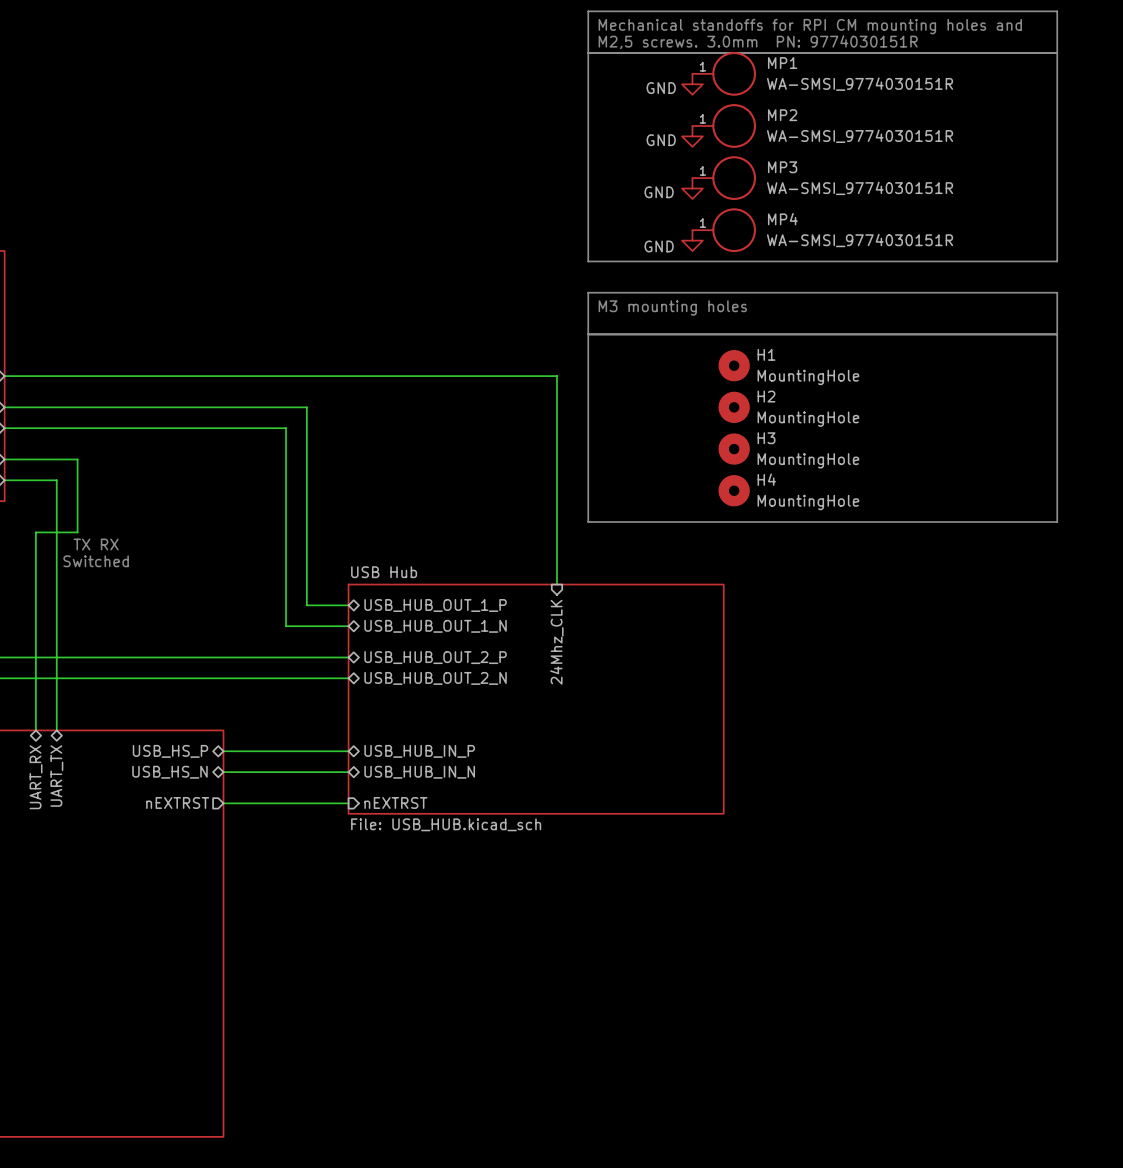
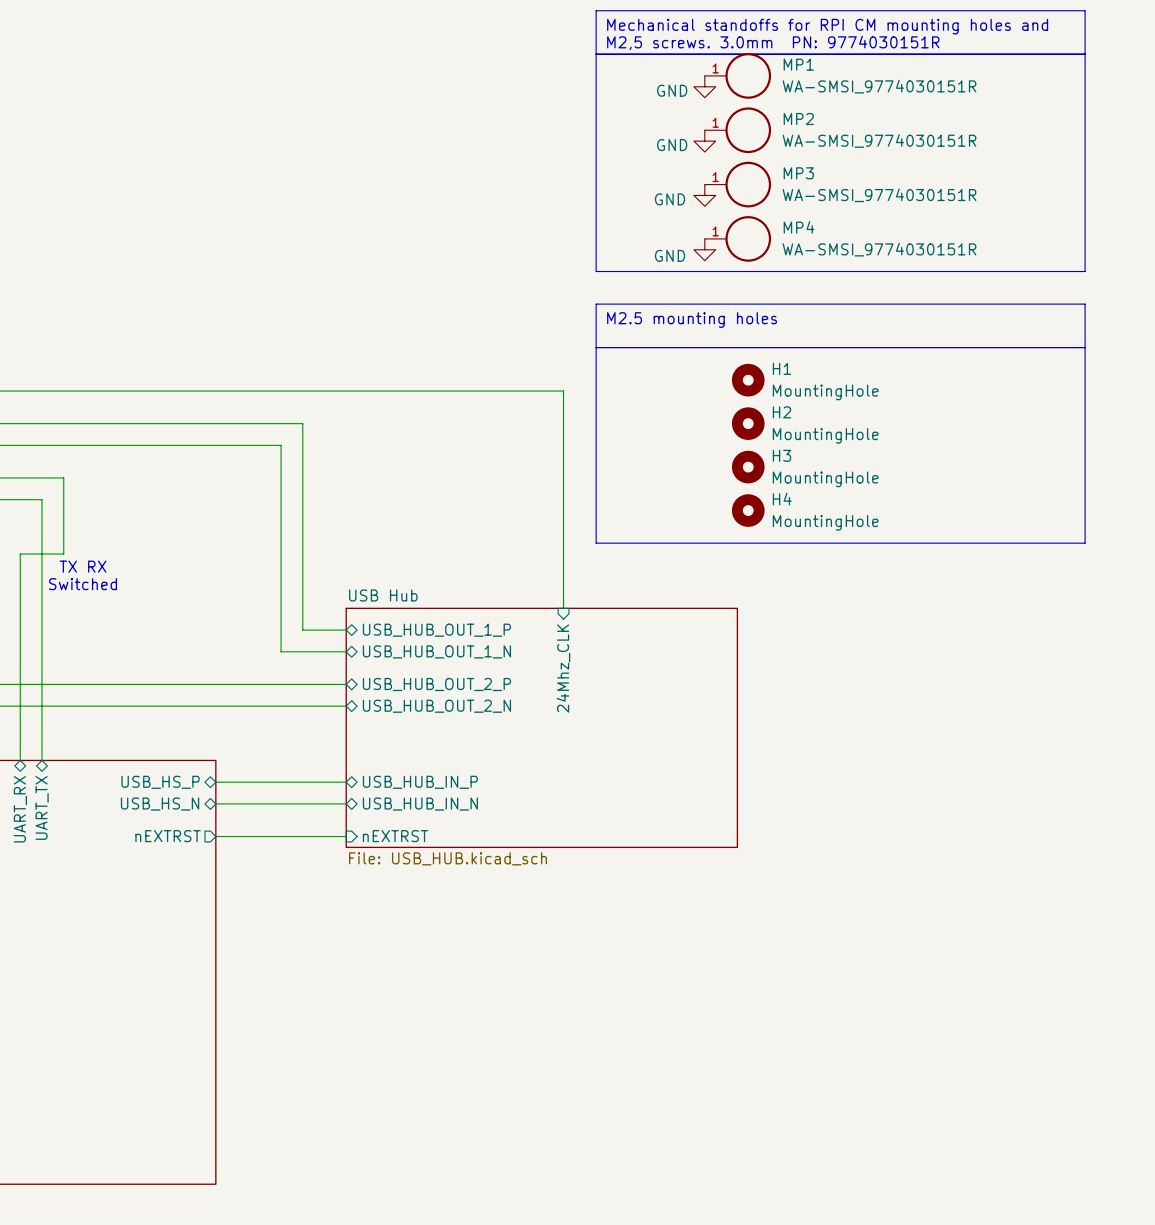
text: M3 mounting holes (672, 307) -> M2.5 mounting holes (692, 320)

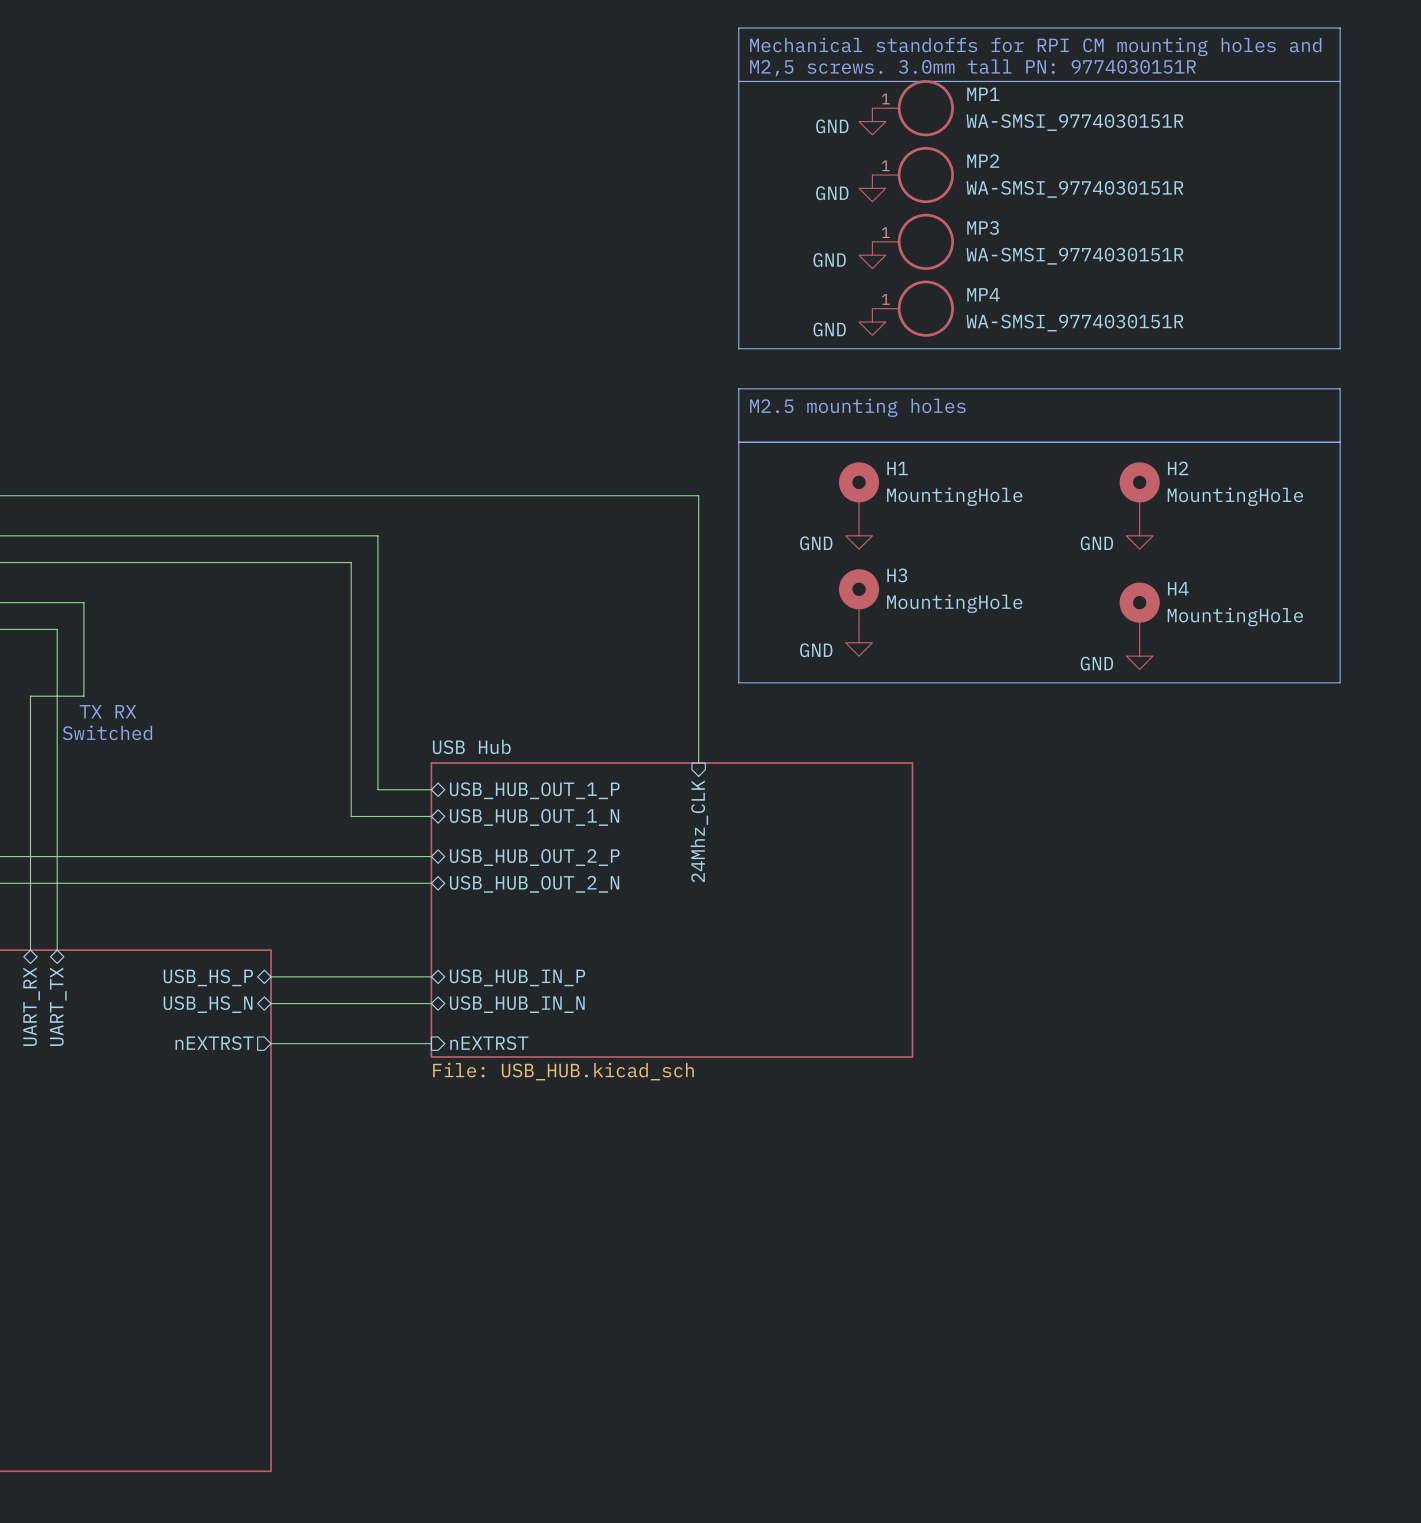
text: M2,5 screws. 3.0mm PN: 9774030151R (773, 42) -> M2,5 screws. 3.0mm tall PN: 9774030151R (972, 67)
H1 symbol: [731, 363, 765, 397] -> [838, 462, 880, 523]
H2 symbol: [731, 407, 765, 440] -> [1119, 462, 1160, 523]
power symbol: none -> GND (859, 535)
power symbol: none -> GND (1139, 535)
H3 symbol: [731, 450, 765, 484] -> [838, 569, 880, 630]
H4 symbol: [731, 494, 765, 527] -> [1119, 582, 1160, 643]
power symbol: none -> GND (859, 642)
power symbol: none -> GND (1139, 656)

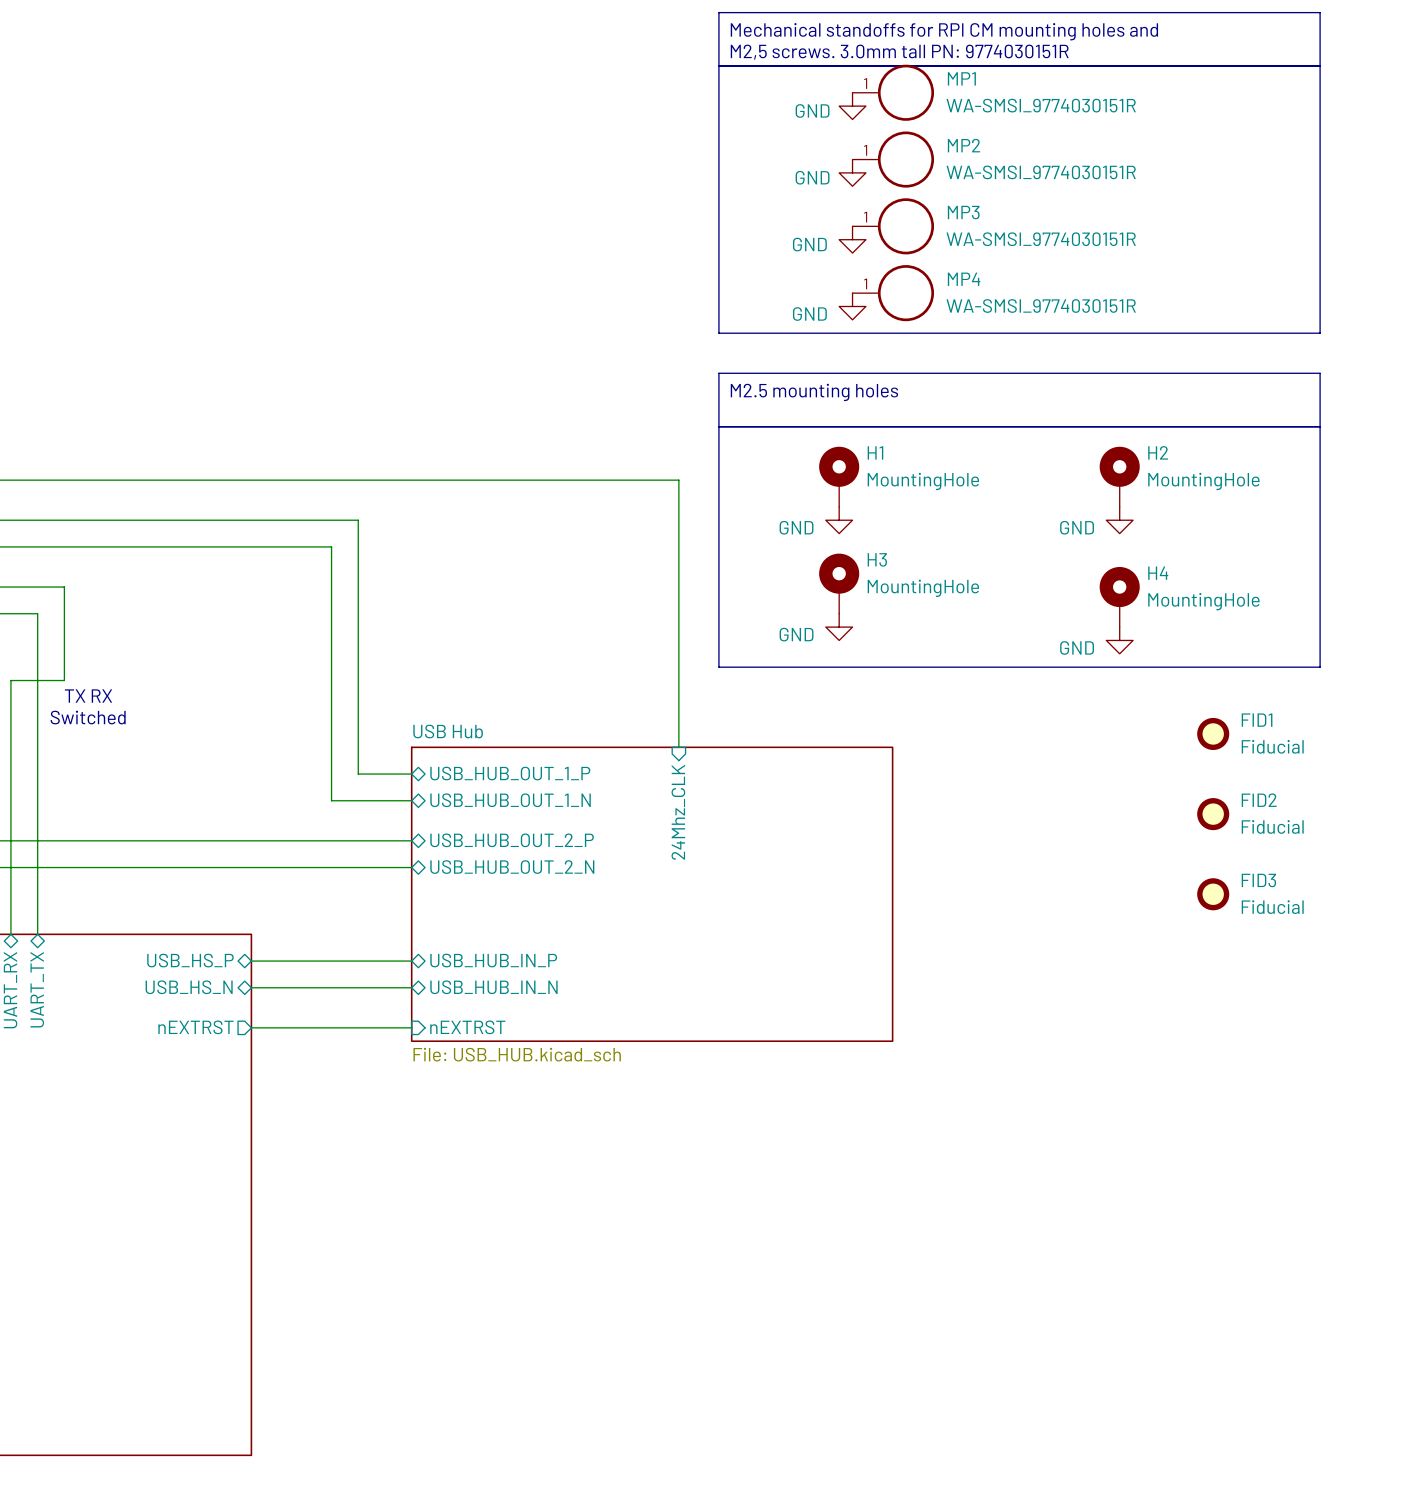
FID1: none -> Fiducial (1213, 733)
FID2: none -> Fiducial (1213, 814)
FID3: none -> Fiducial (1213, 894)

